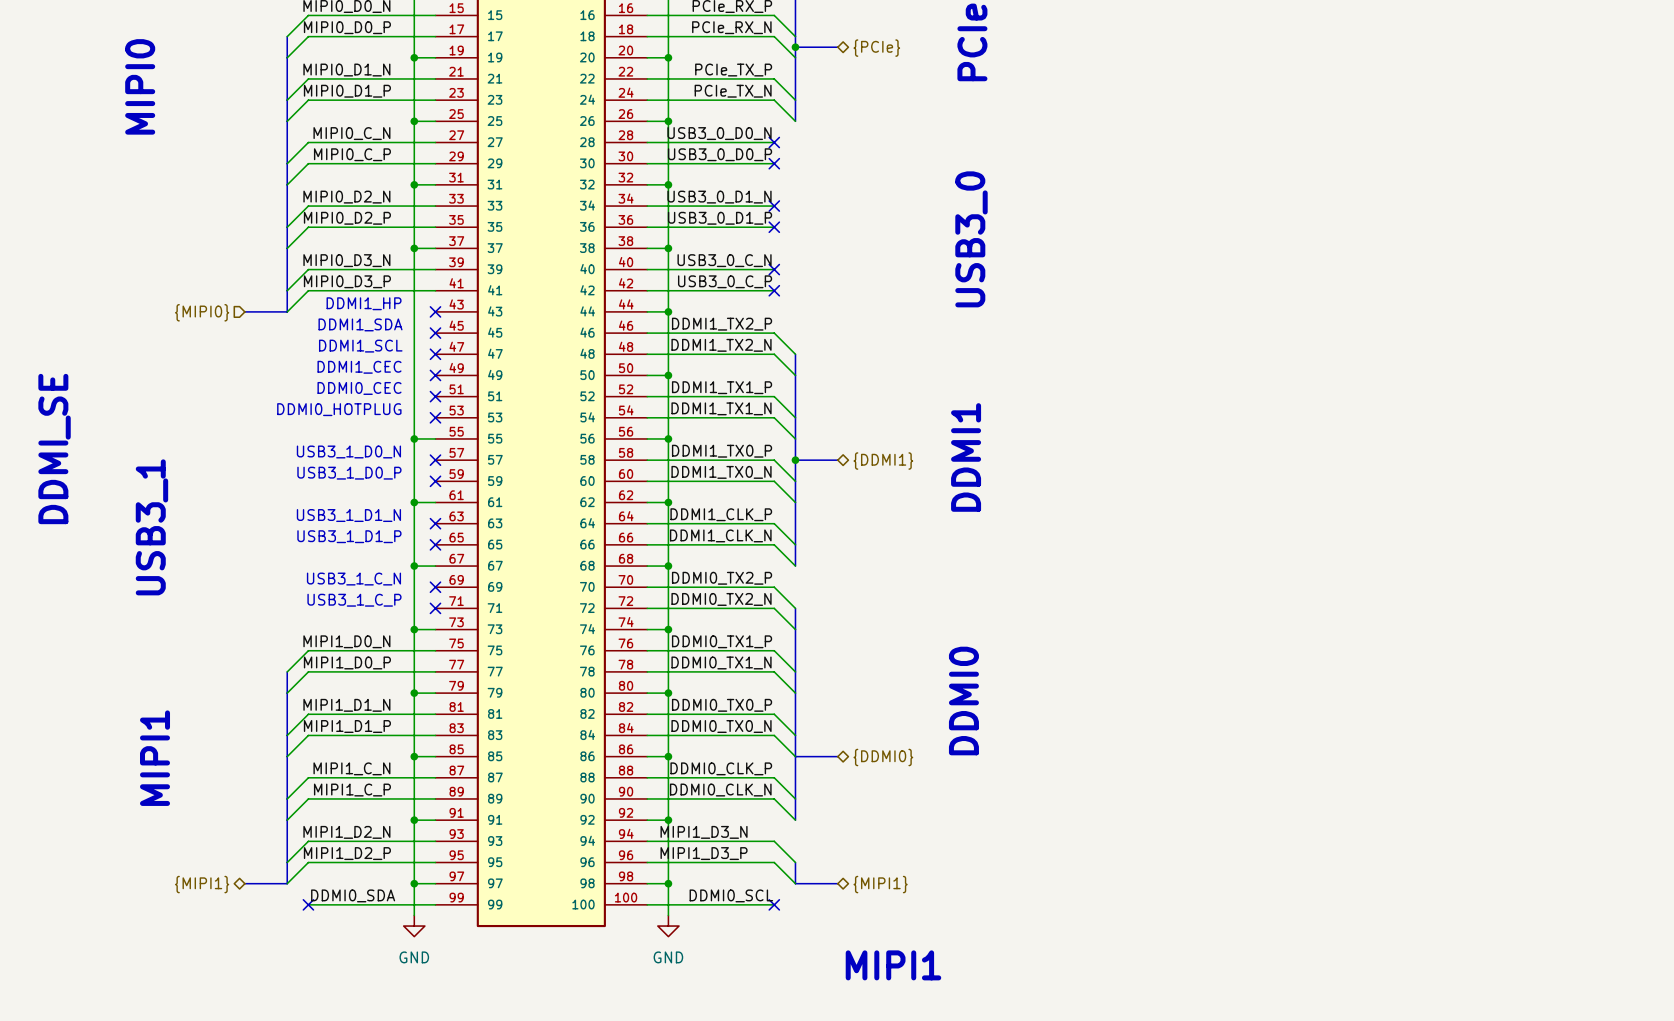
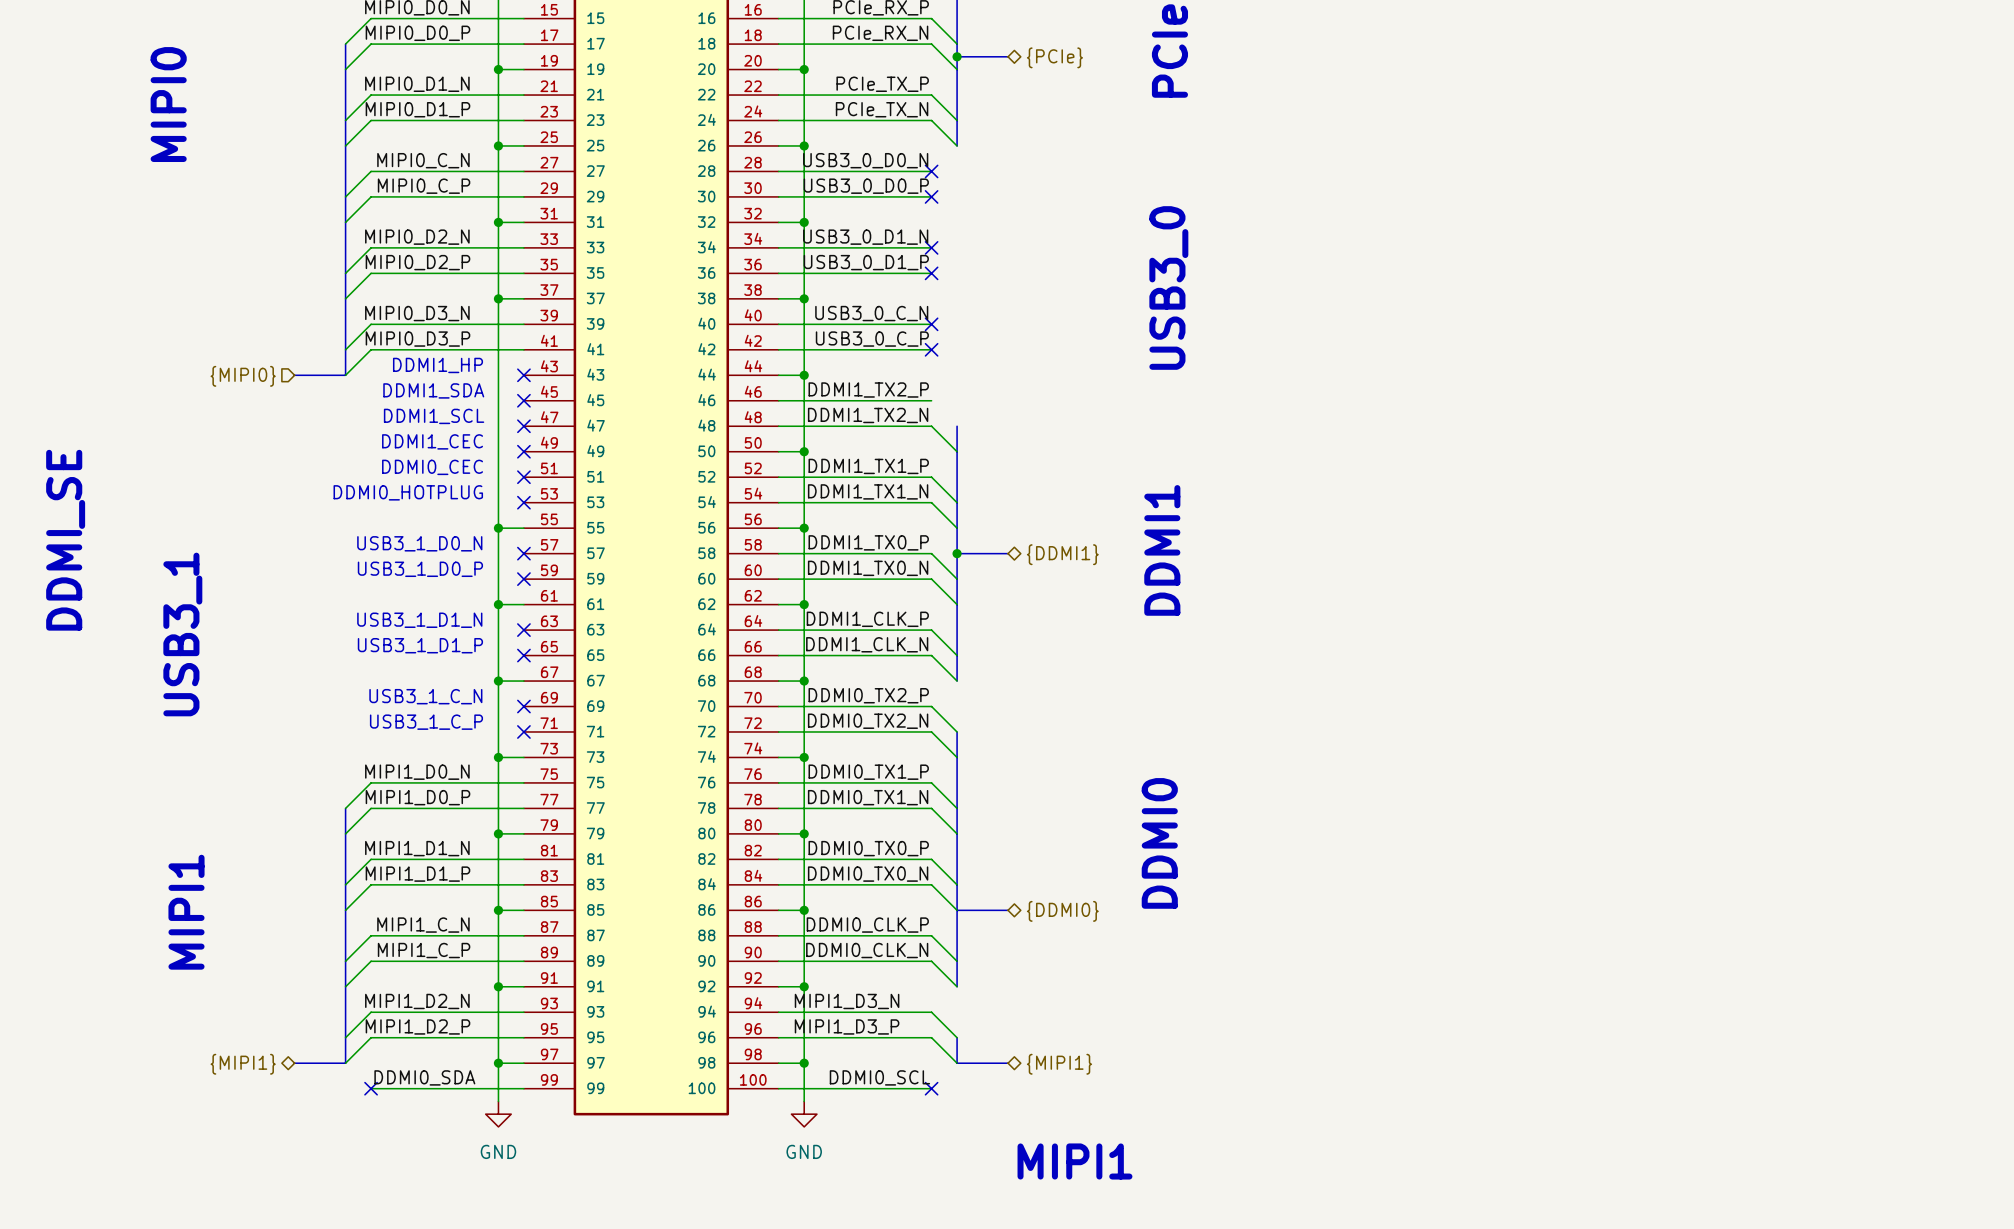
wire: (774, 333) (795, 354) -> none

